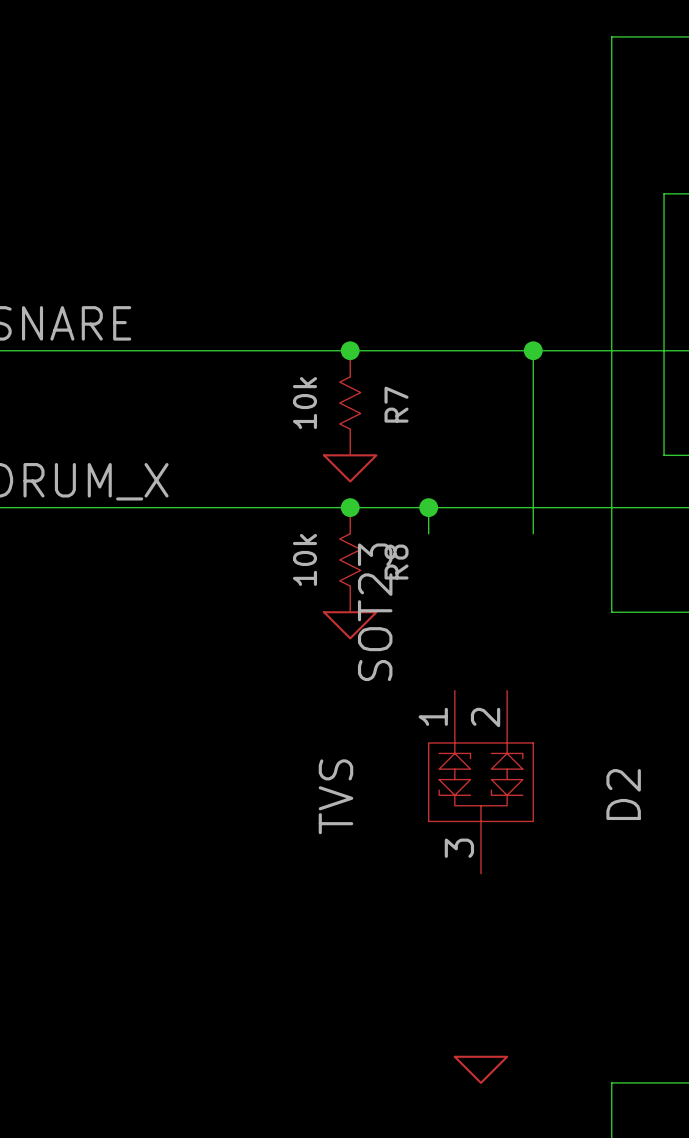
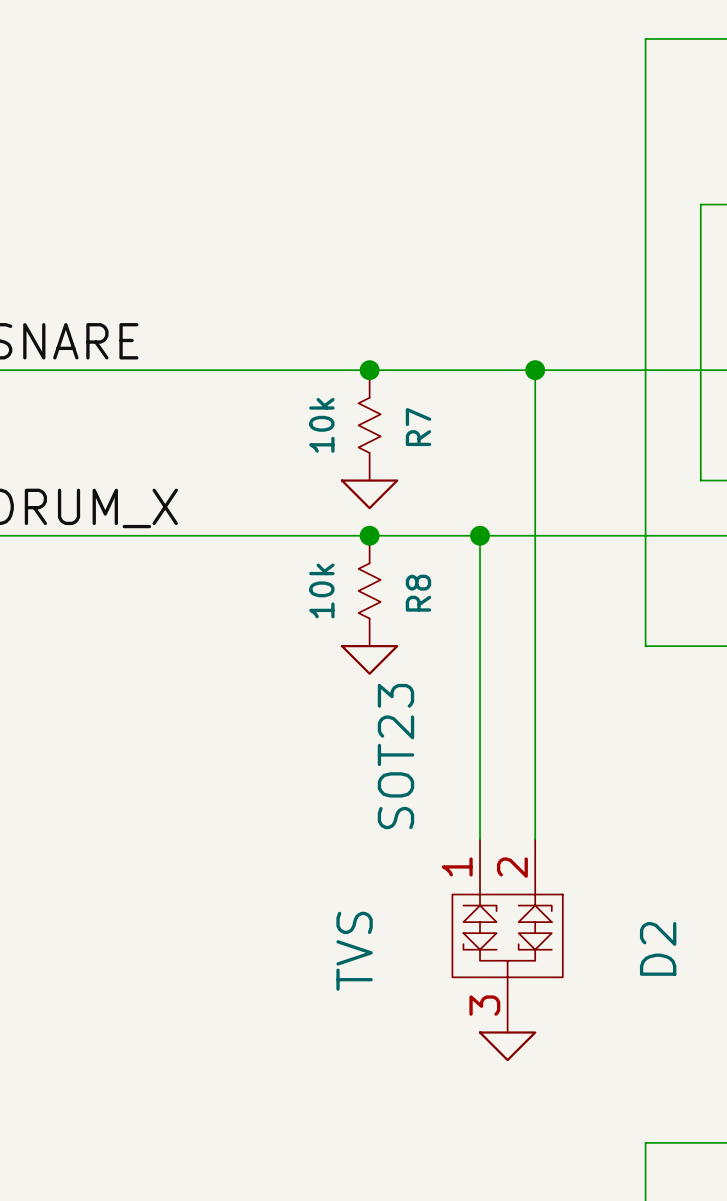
wire: none -> (535, 370) (535, 839)
wire: (533, 350) (533, 533) -> none
junction position: (533, 350) -> (535, 370)
wire: (428, 507) (428, 533) -> none
junction position: (428, 507) -> (480, 535)
wire: none -> (480, 535) (480, 839)
D2 position: (480, 782) -> (507, 935)
power symbol position: (480, 1069) -> (507, 1046)

